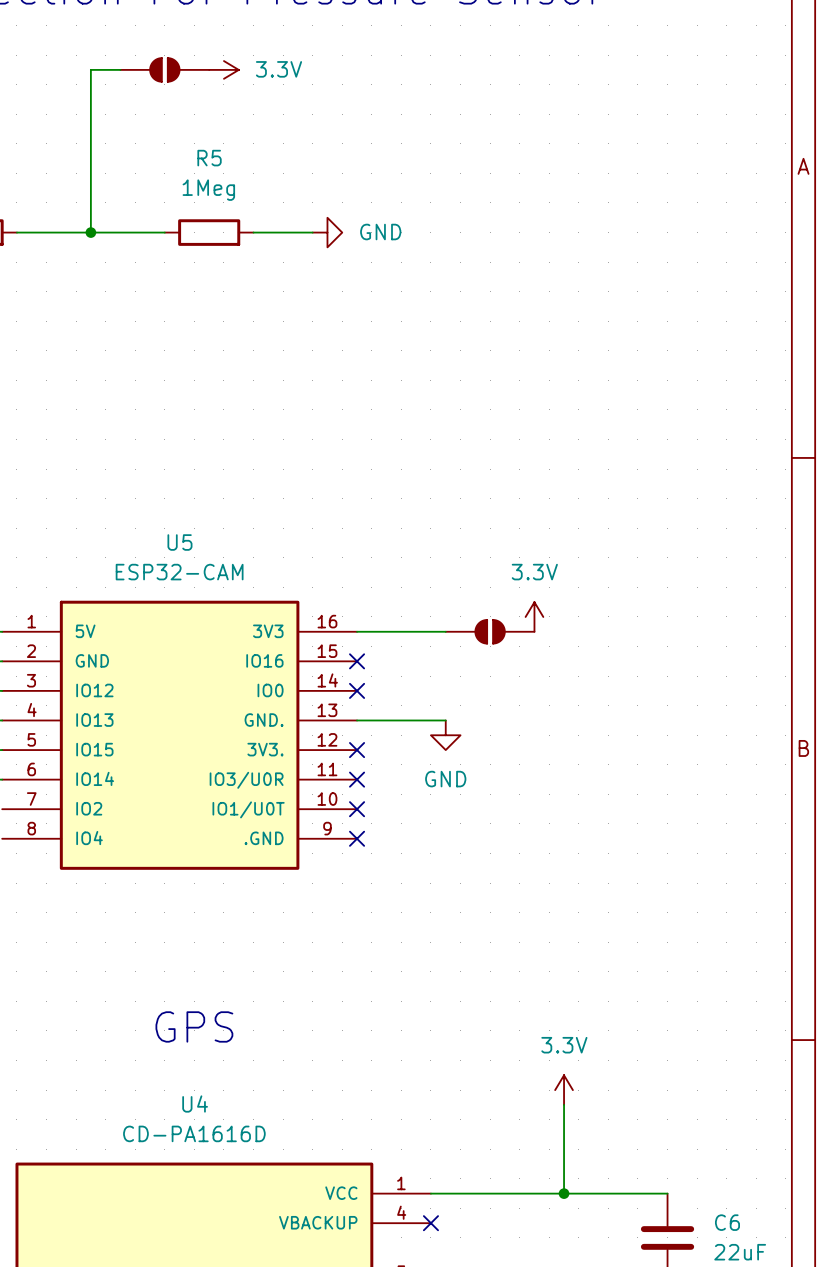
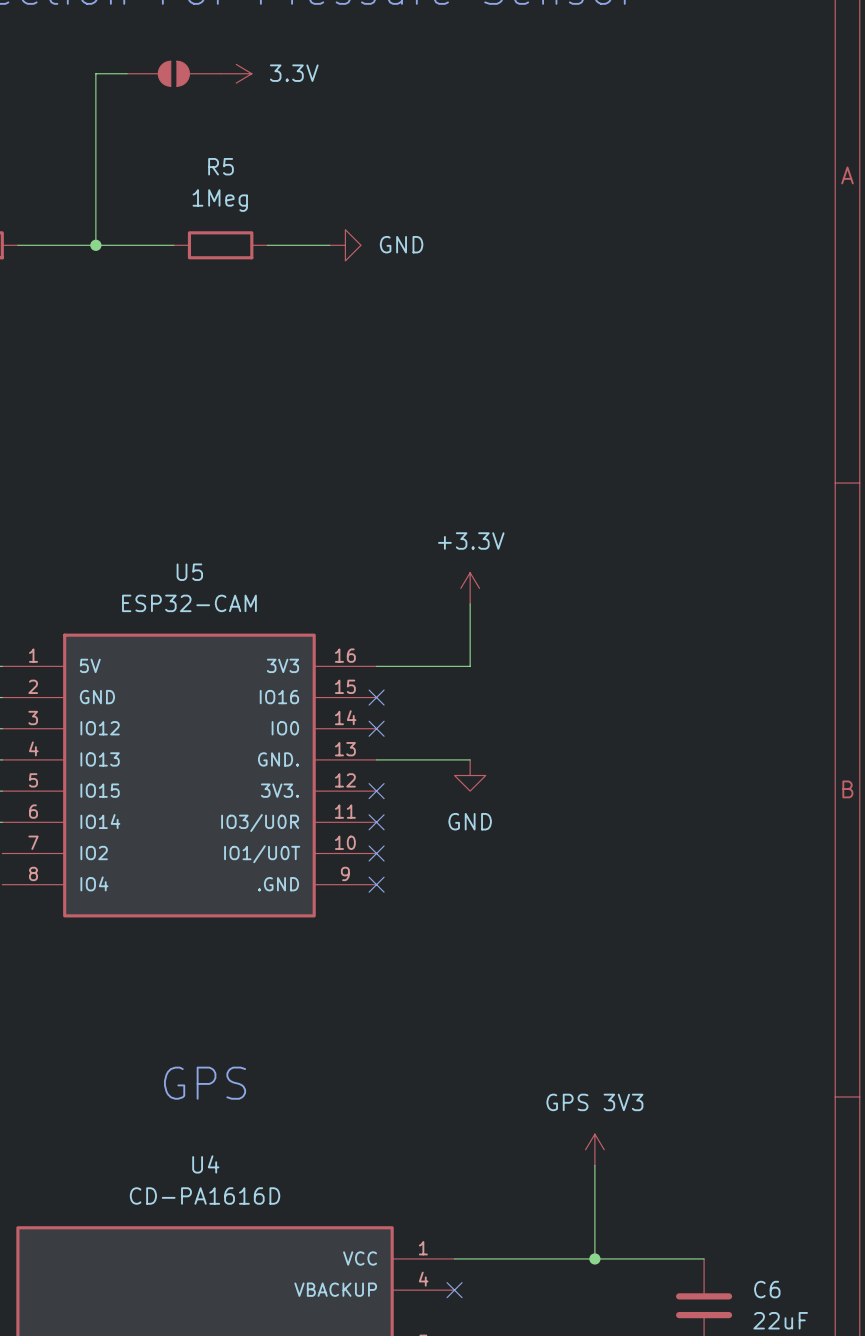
power symbol: none -> +3.3V (470, 588)
wire: none -> (470, 603) (470, 666)
power symbol: 3.3V (534, 616) -> none
part: (490, 631) -> none
power symbol: 3.3V (564, 1090) -> GPS 3V3 (594, 1149)

